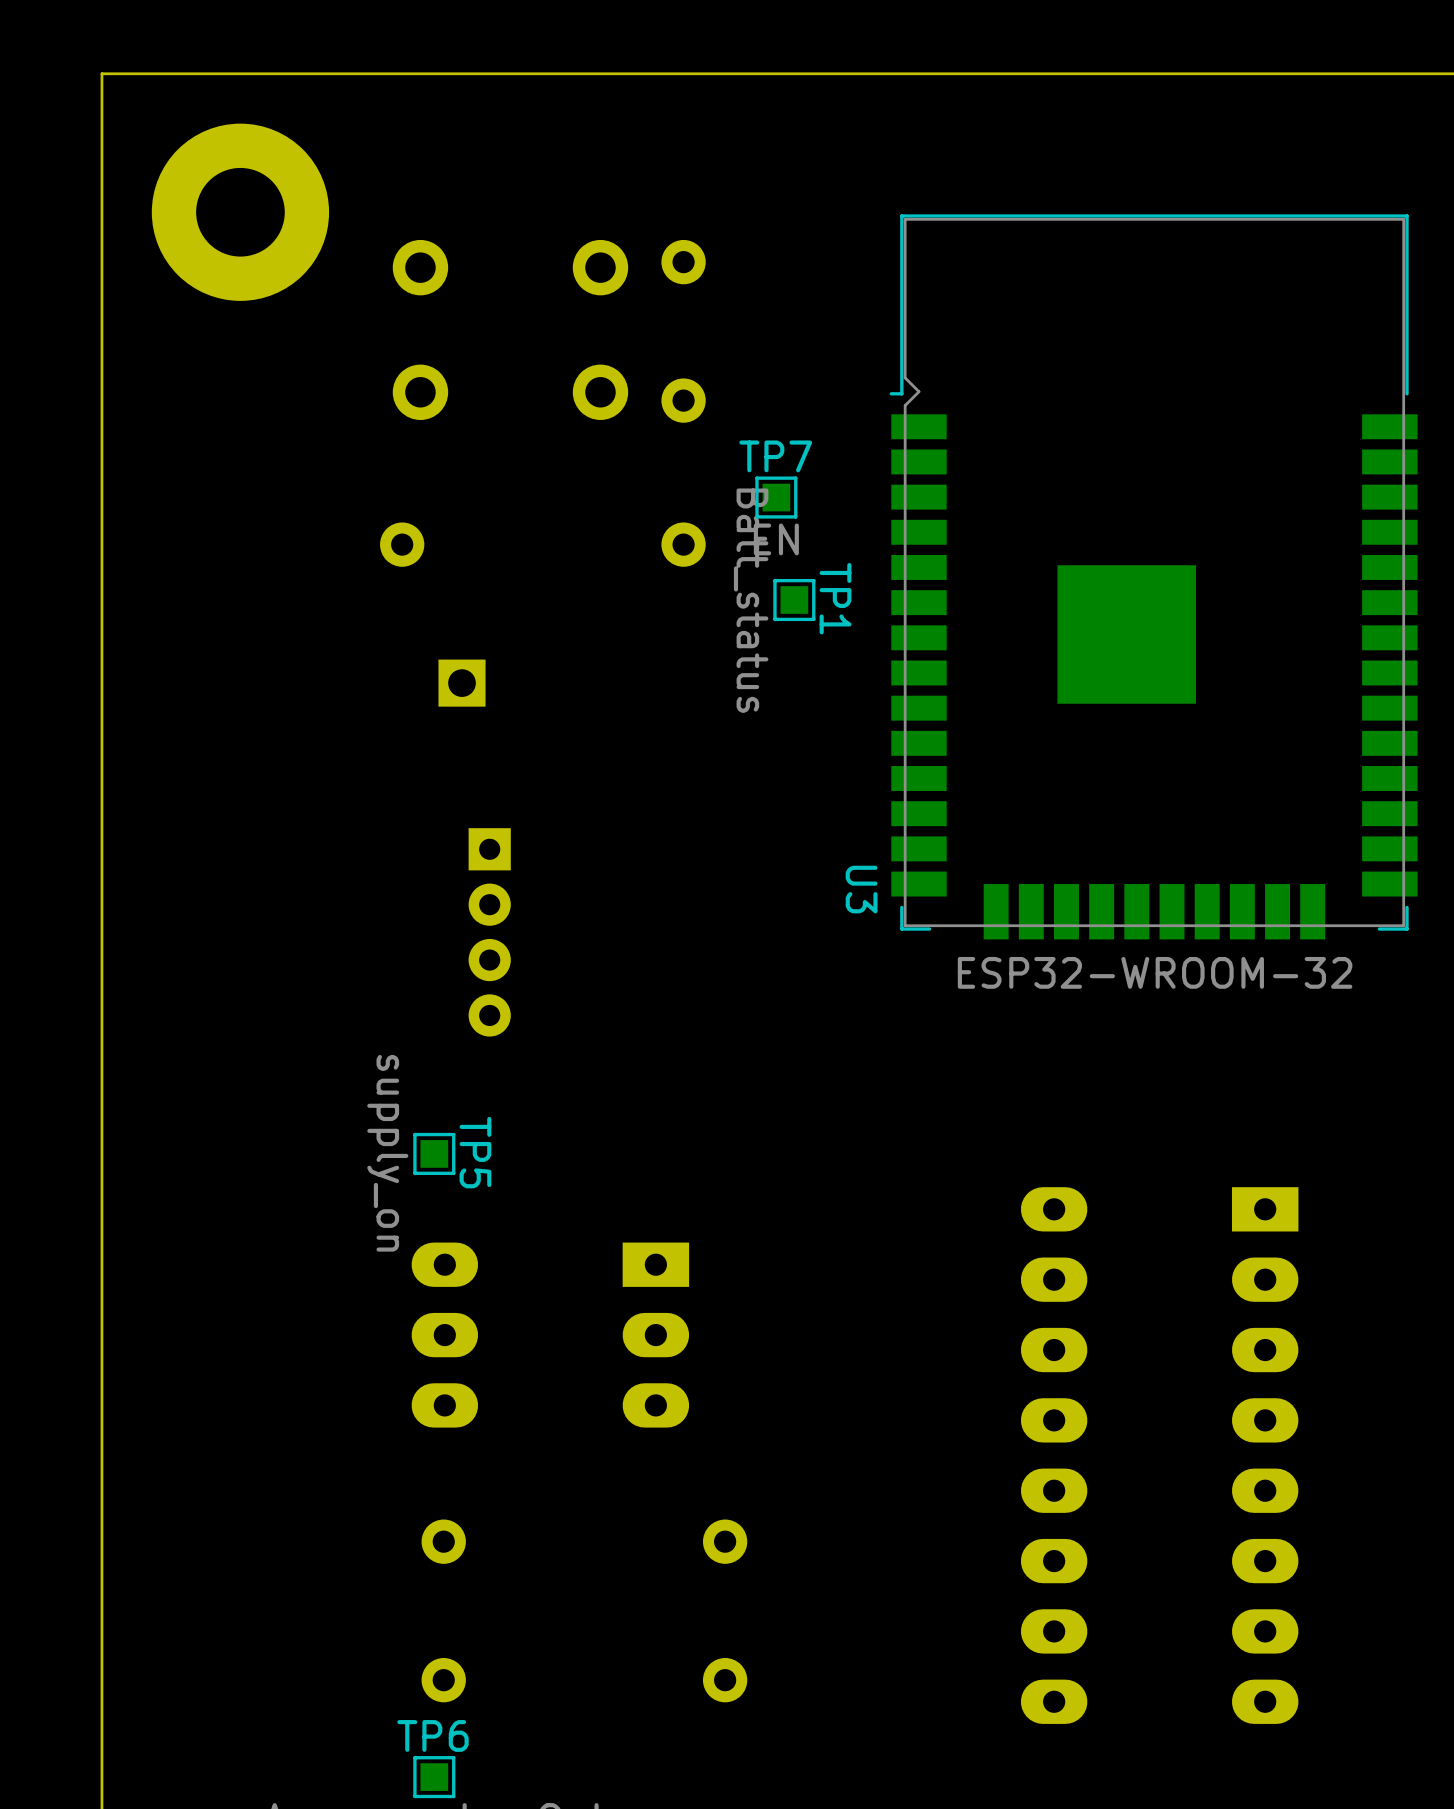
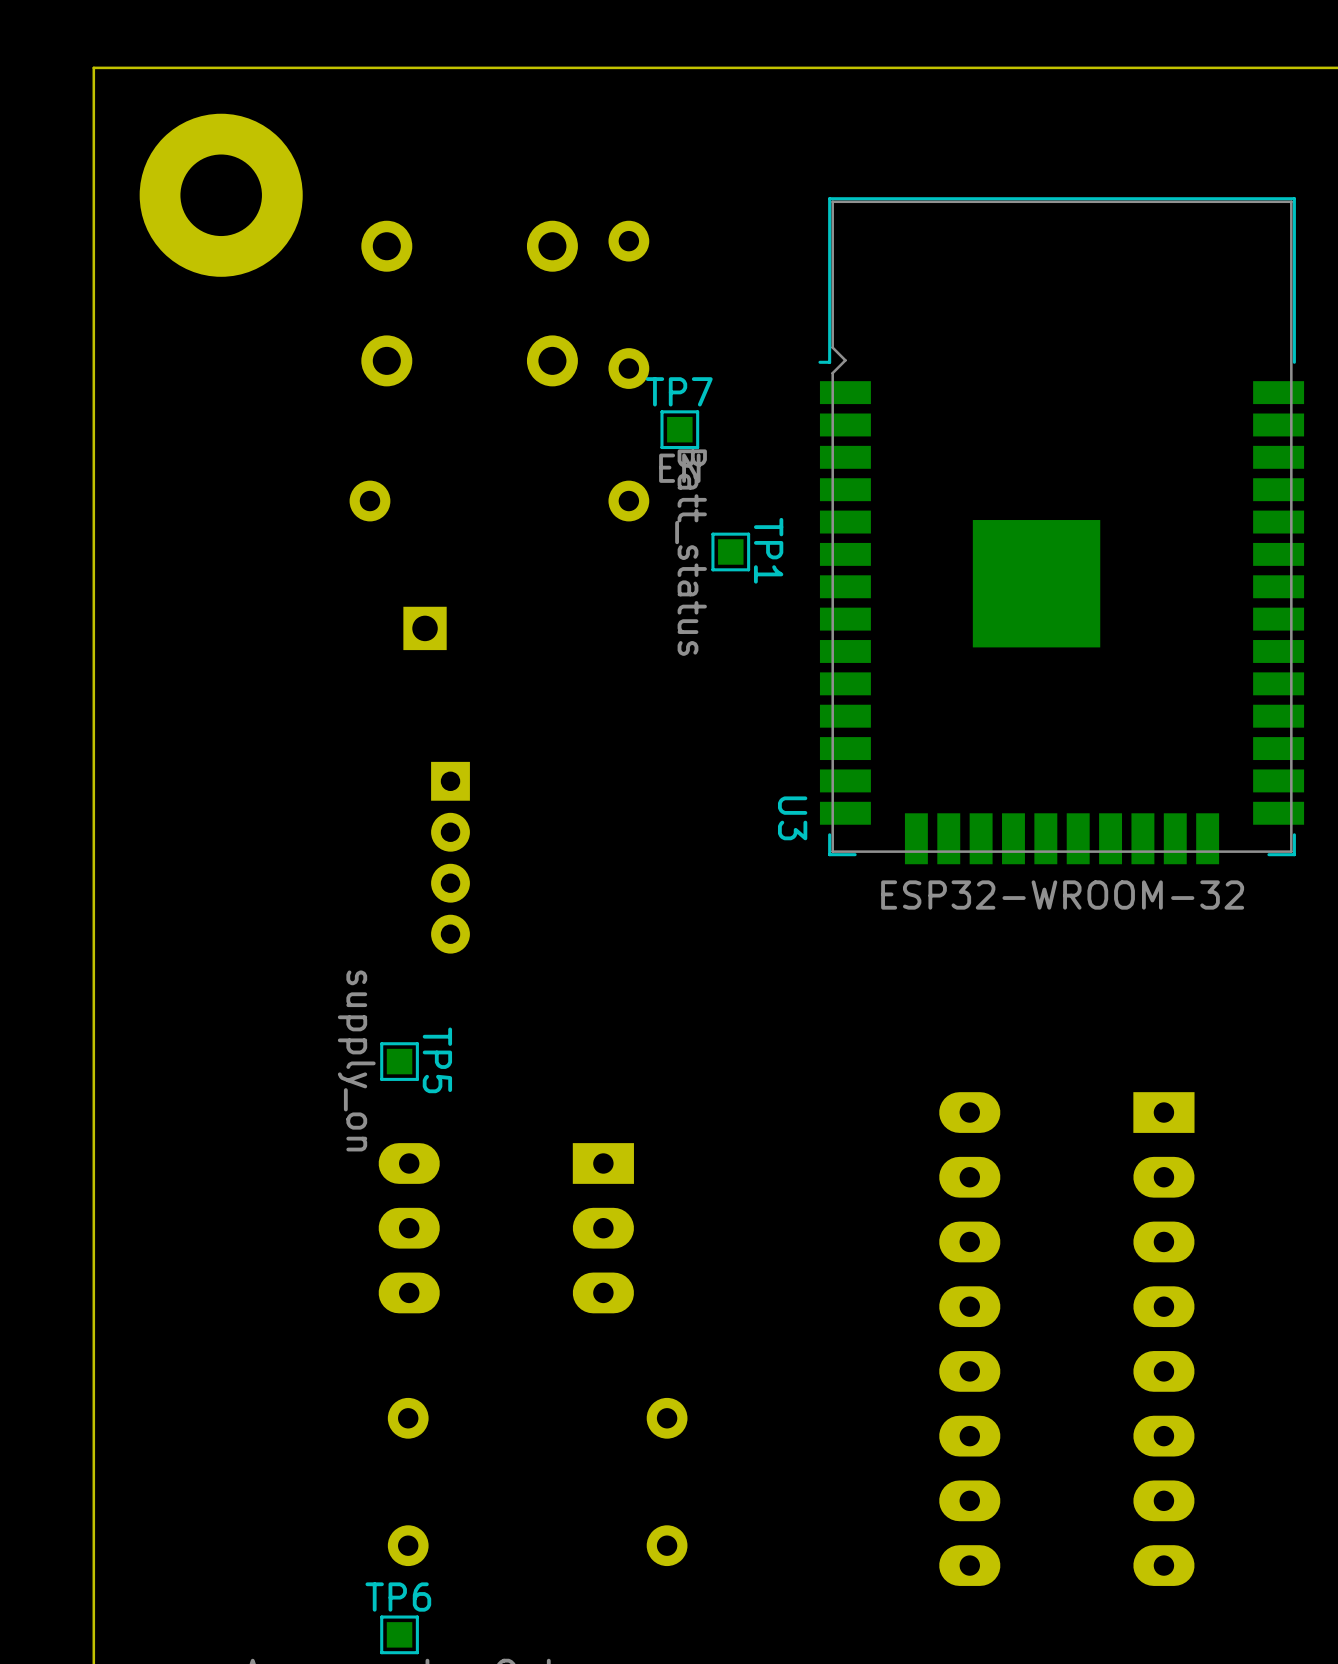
TP7 position: (776, 497) -> (679, 429)

